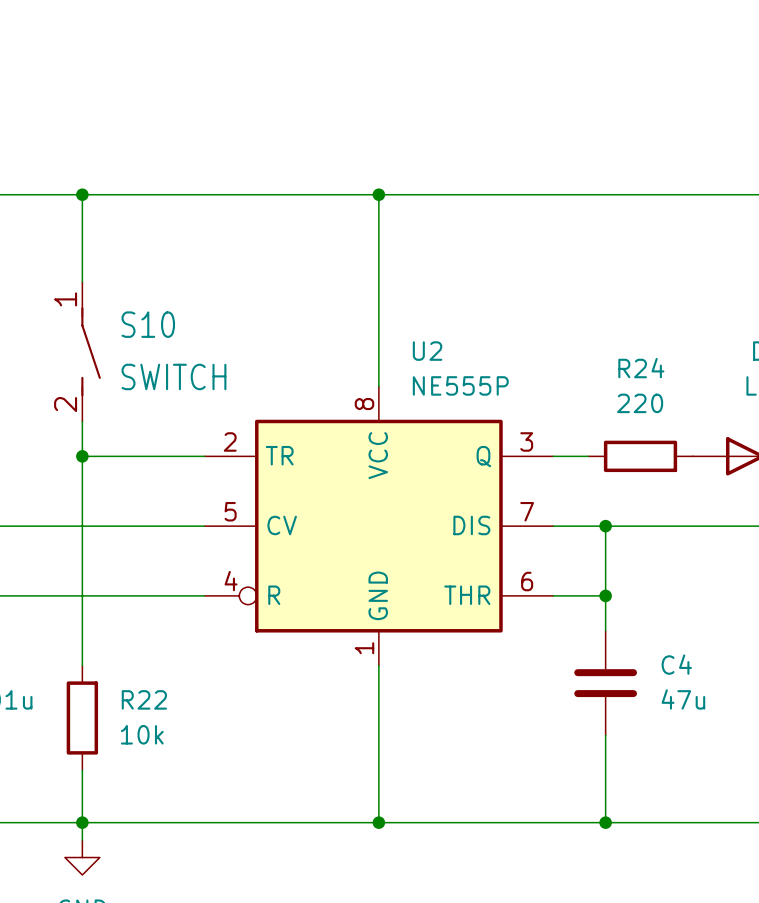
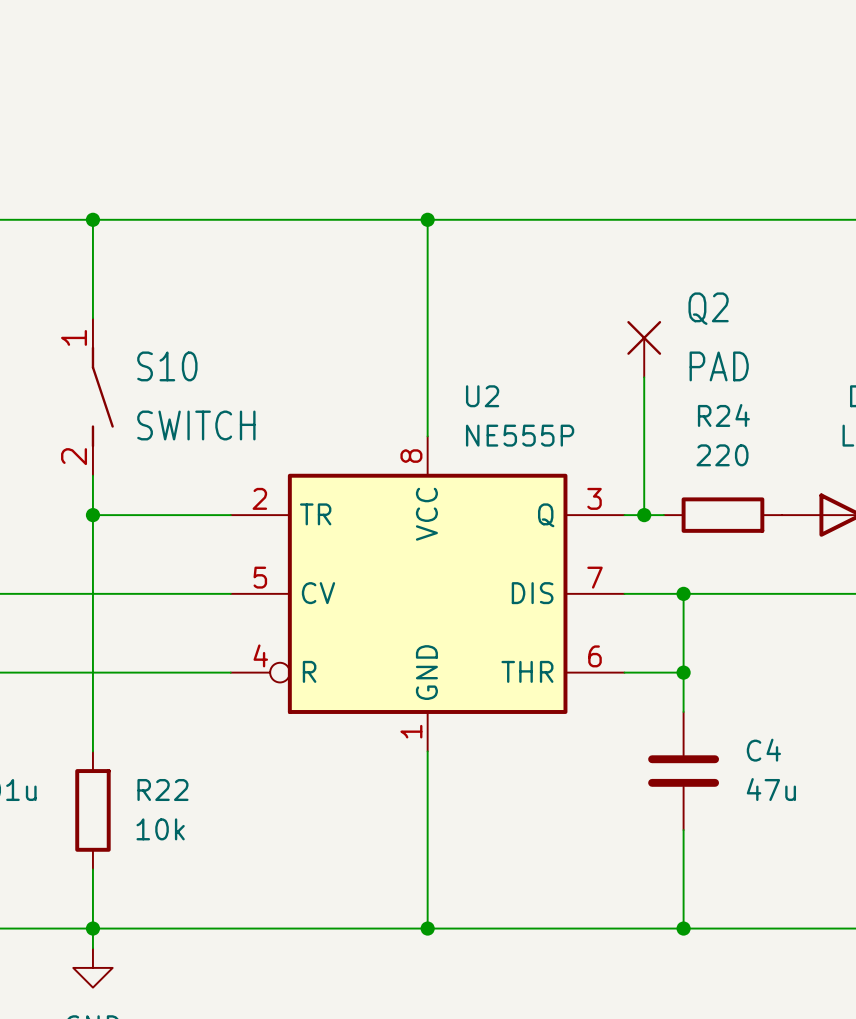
Q2: none -> PAD (644, 349)
wire: none -> (644, 377) (644, 515)
junction: none -> (644, 515)

